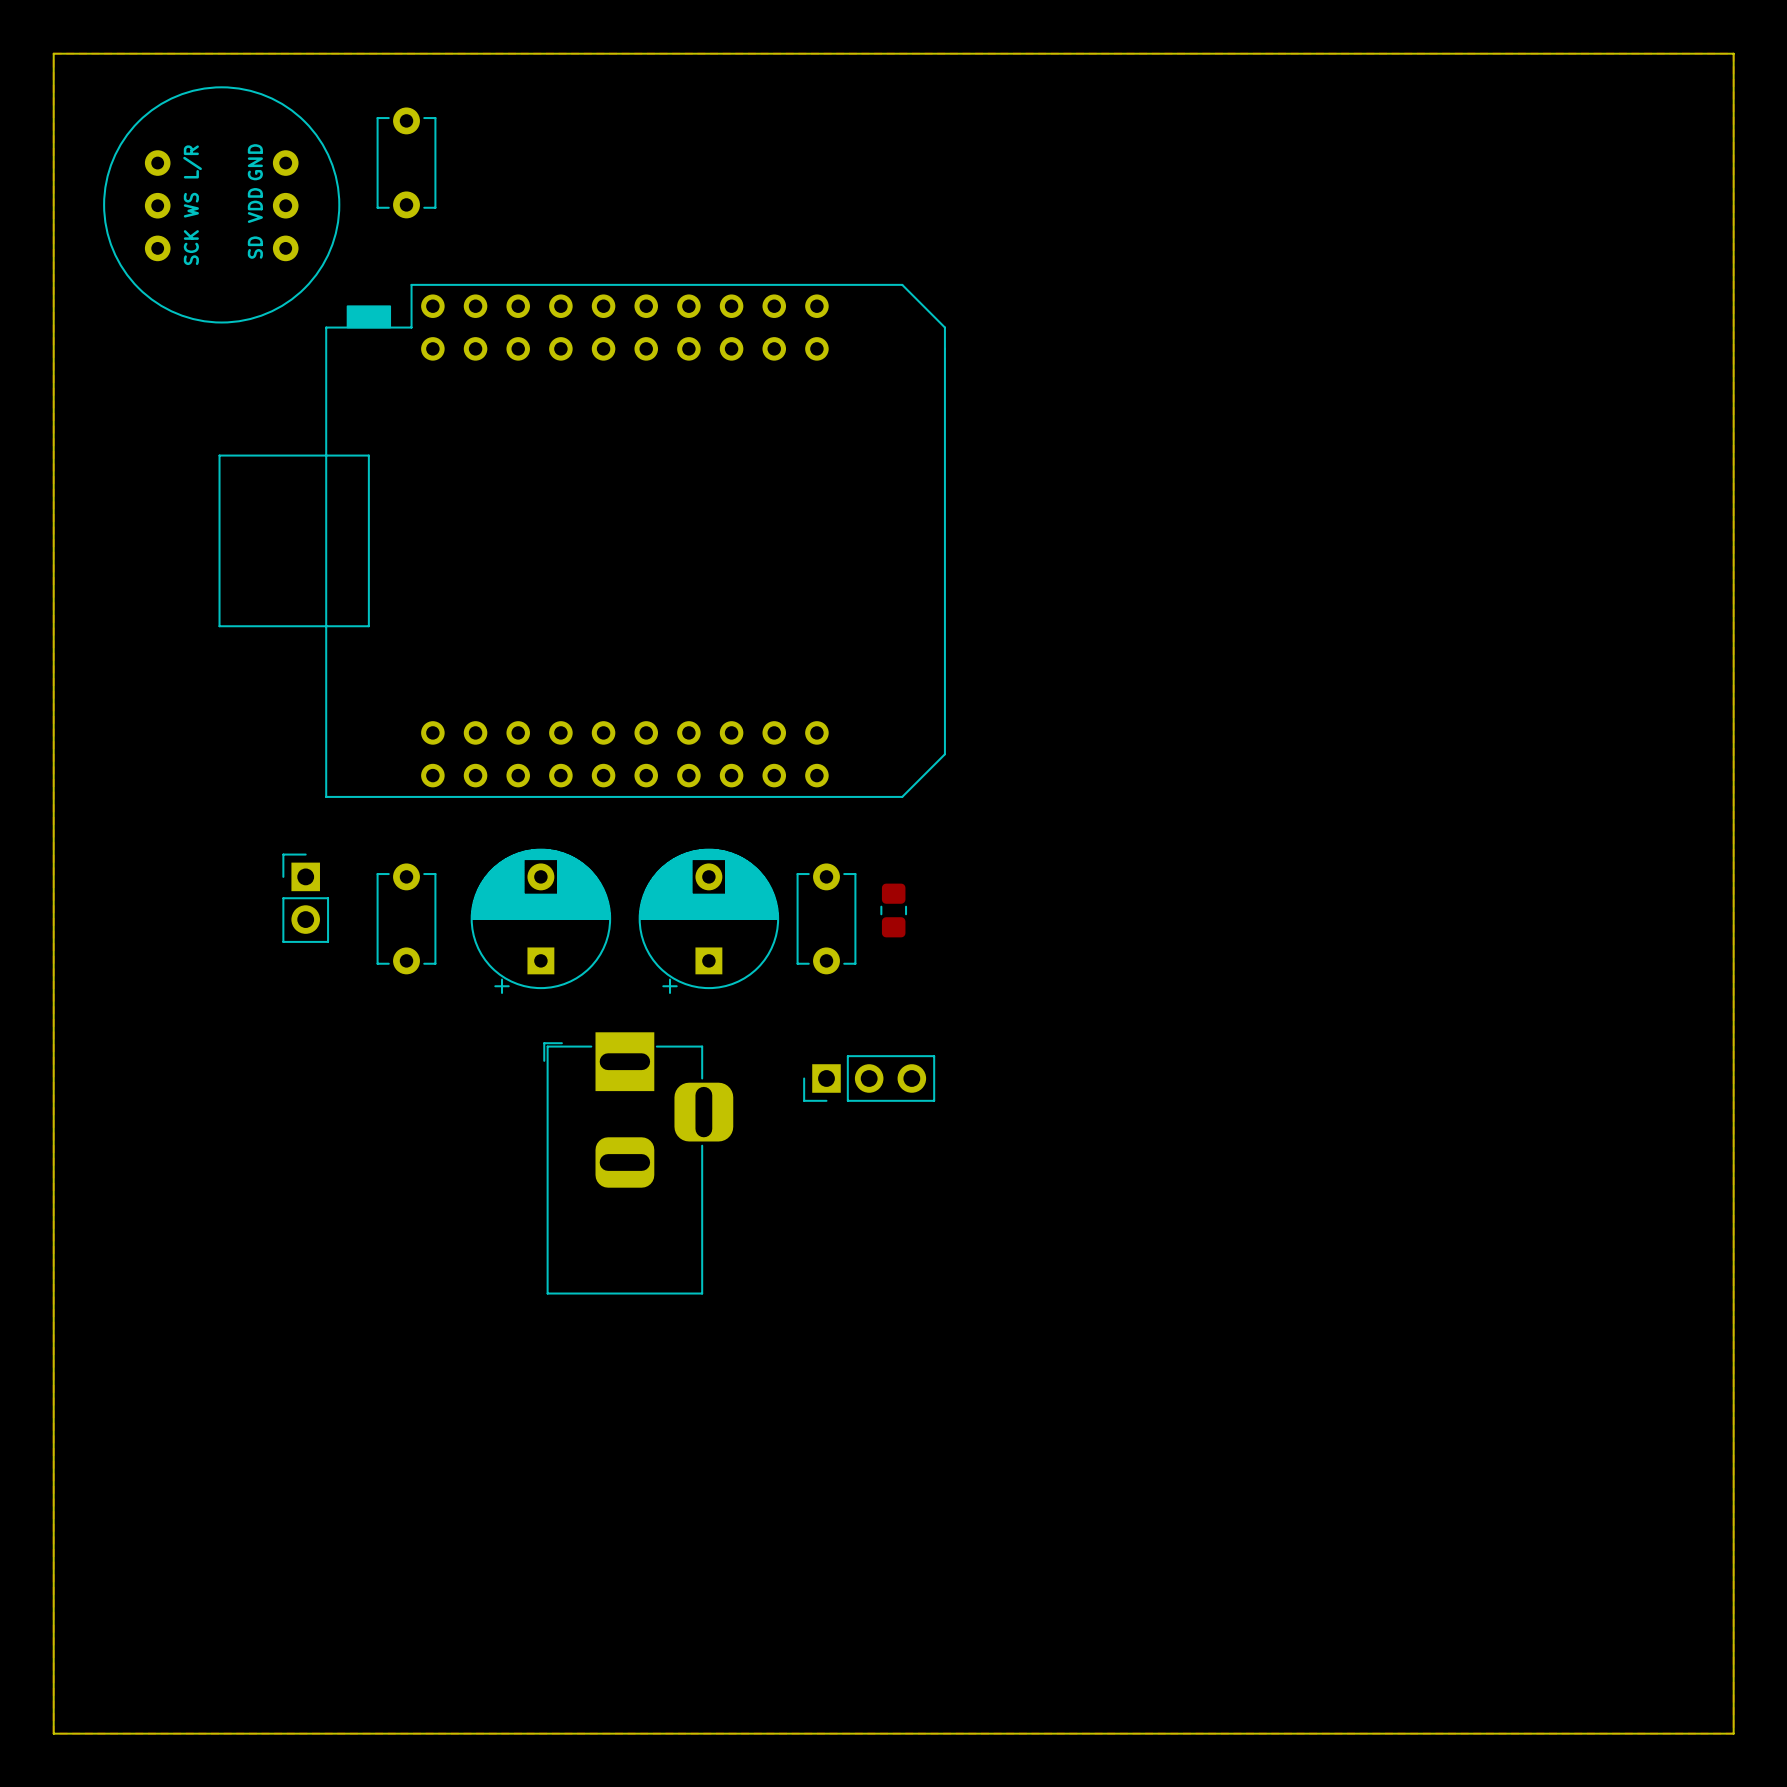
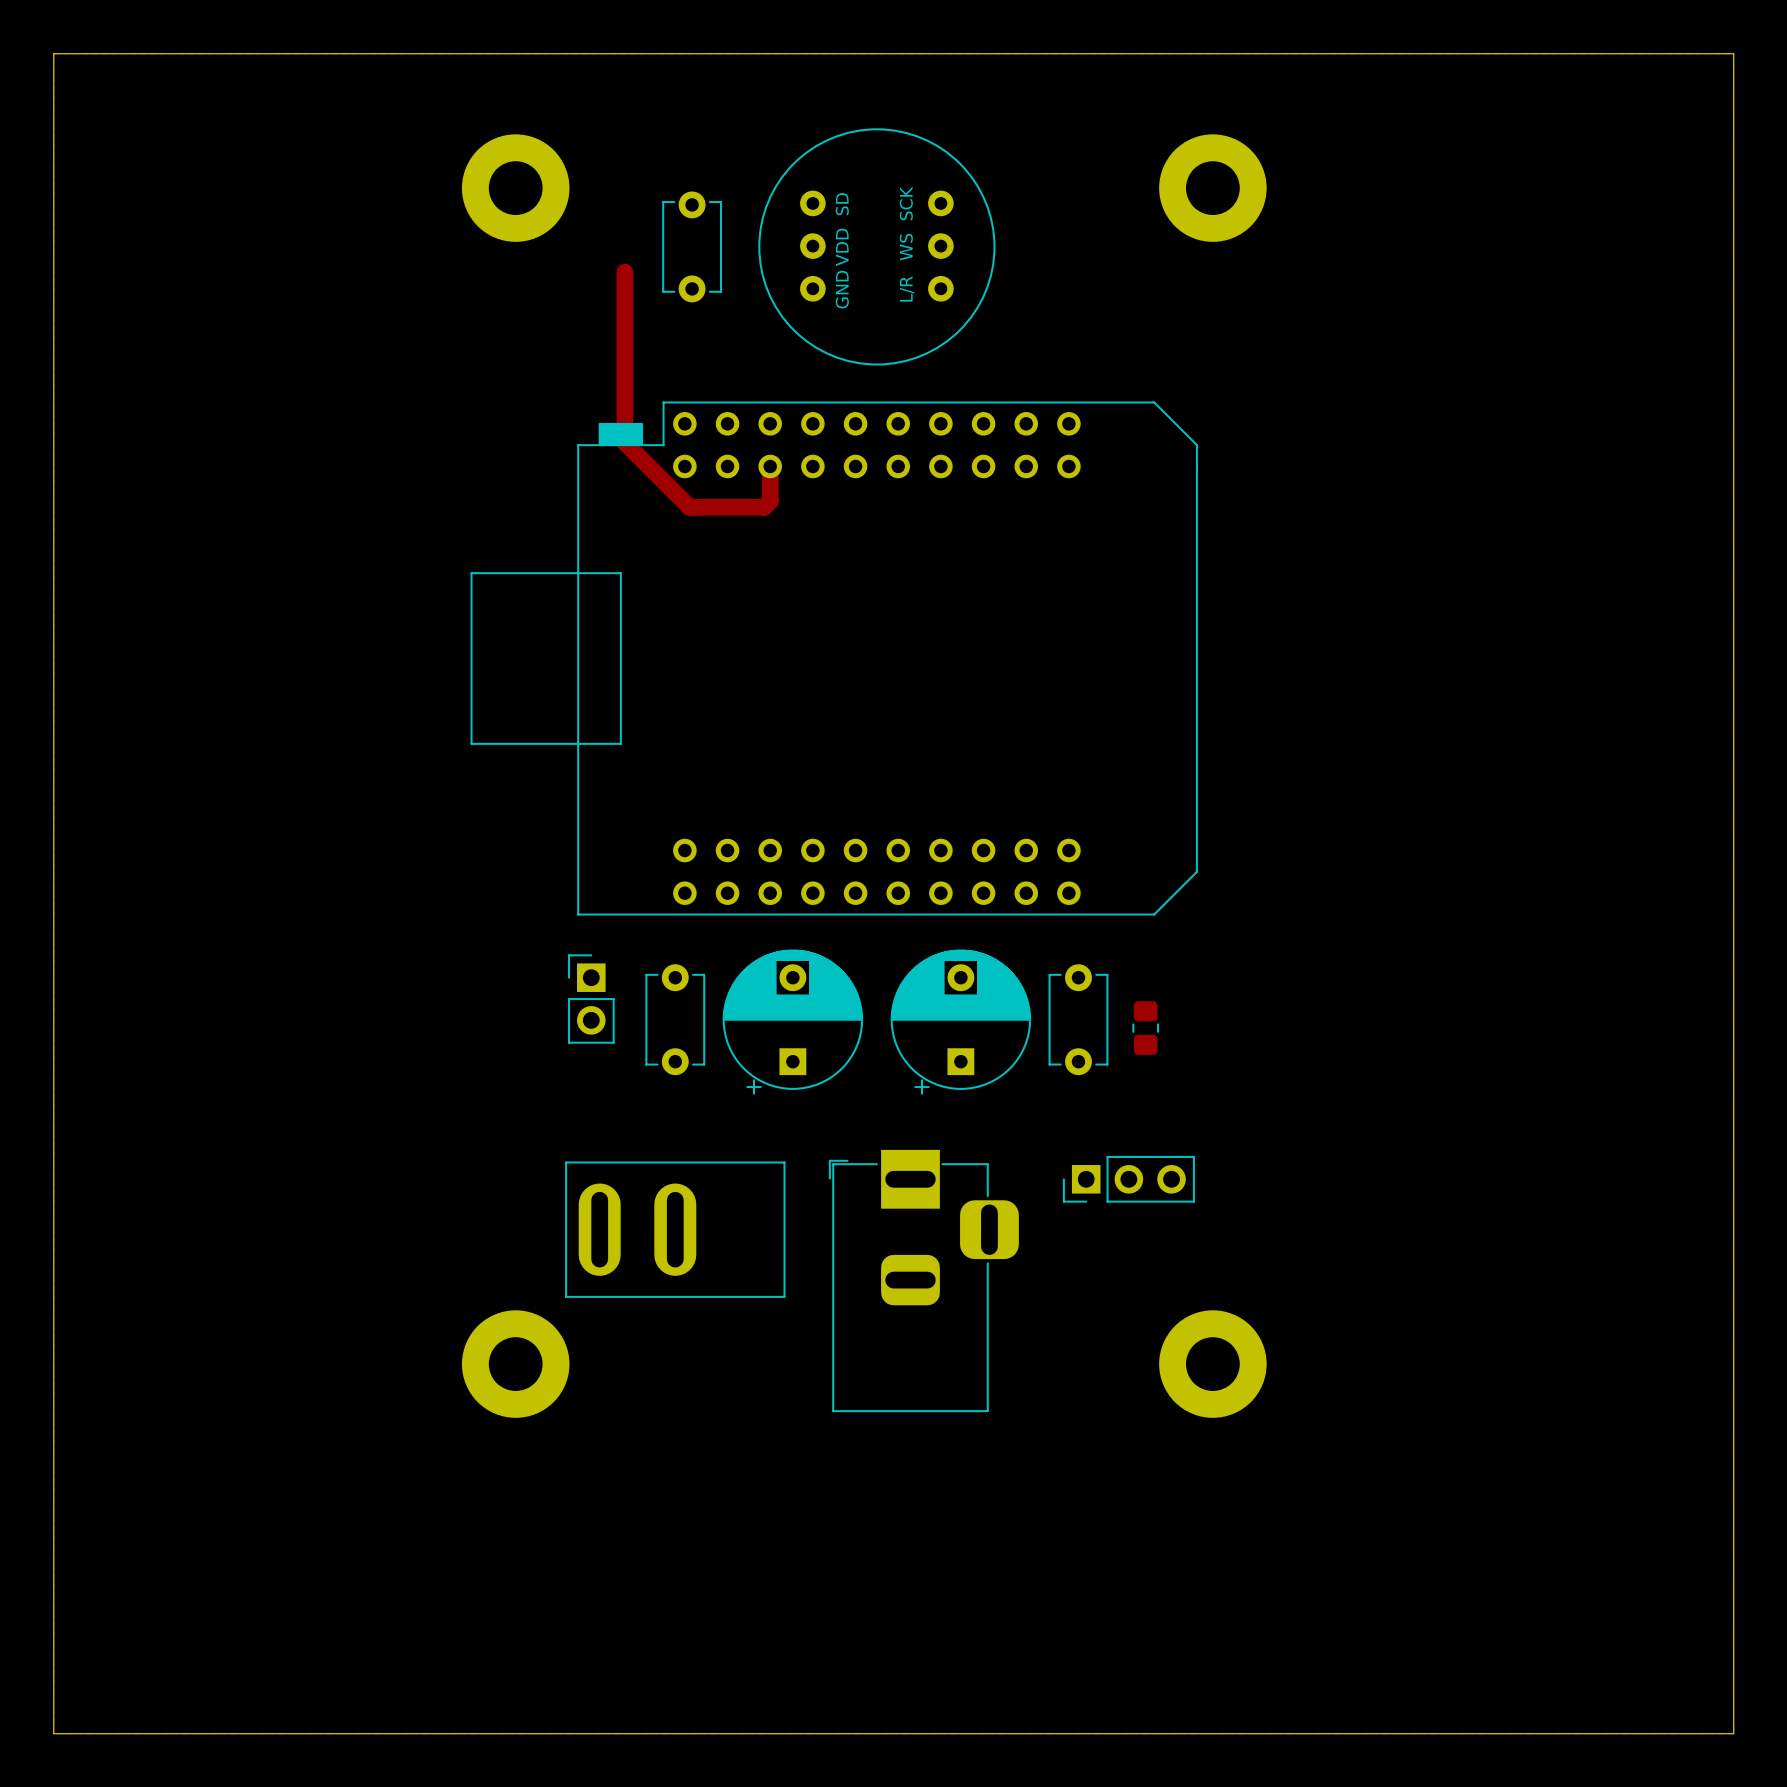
part position: (406, 162) -> (692, 246)
part: none -> (515, 188)
part: none -> (1212, 188)
part: (221, 204) -> none
part: none -> (876, 246)
track: none -> (624, 272) (624, 442) (689, 507) (764, 507) (770, 501) (770, 466)
part position: (582, 540) -> (834, 658)
part position: (305, 898) -> (591, 999)
part position: (893, 910) -> (1145, 1028)
part: (406, 918) -> none
part: (826, 918) -> none
part: (540, 921) -> none
part position: (708, 921) -> (792, 1022)
part: none -> (675, 1019)
part: none -> (1078, 1019)
part: none -> (960, 1022)
part position: (869, 1078) -> (1128, 1179)
part position: (638, 1163) -> (923, 1281)
part: none -> (675, 1229)
part: none -> (515, 1364)
part: none -> (1212, 1364)

